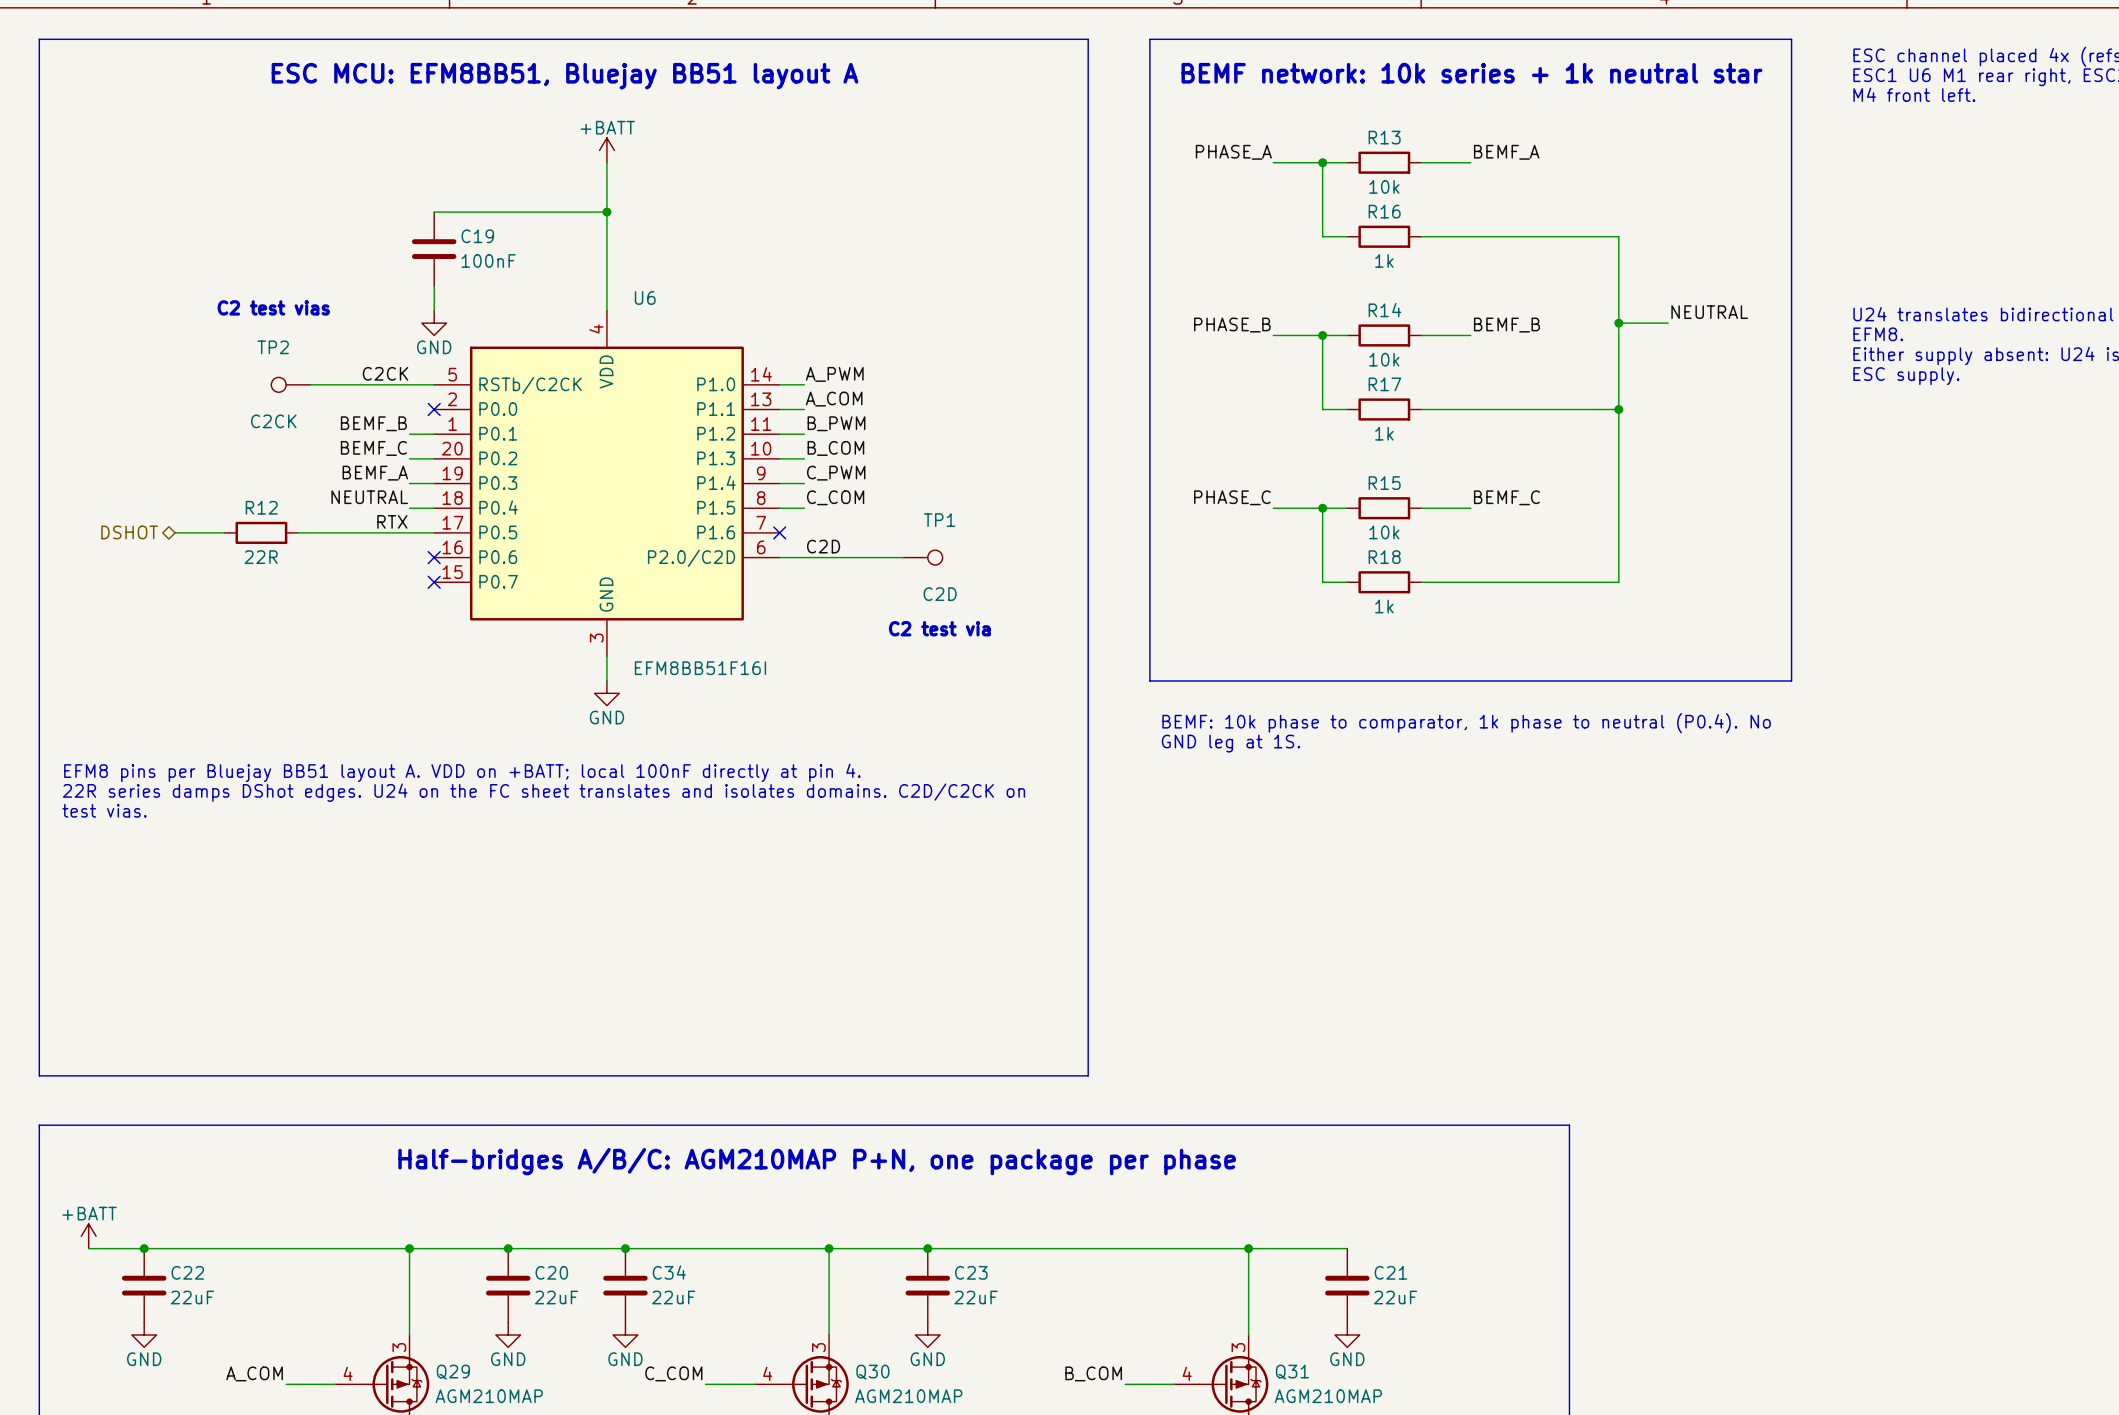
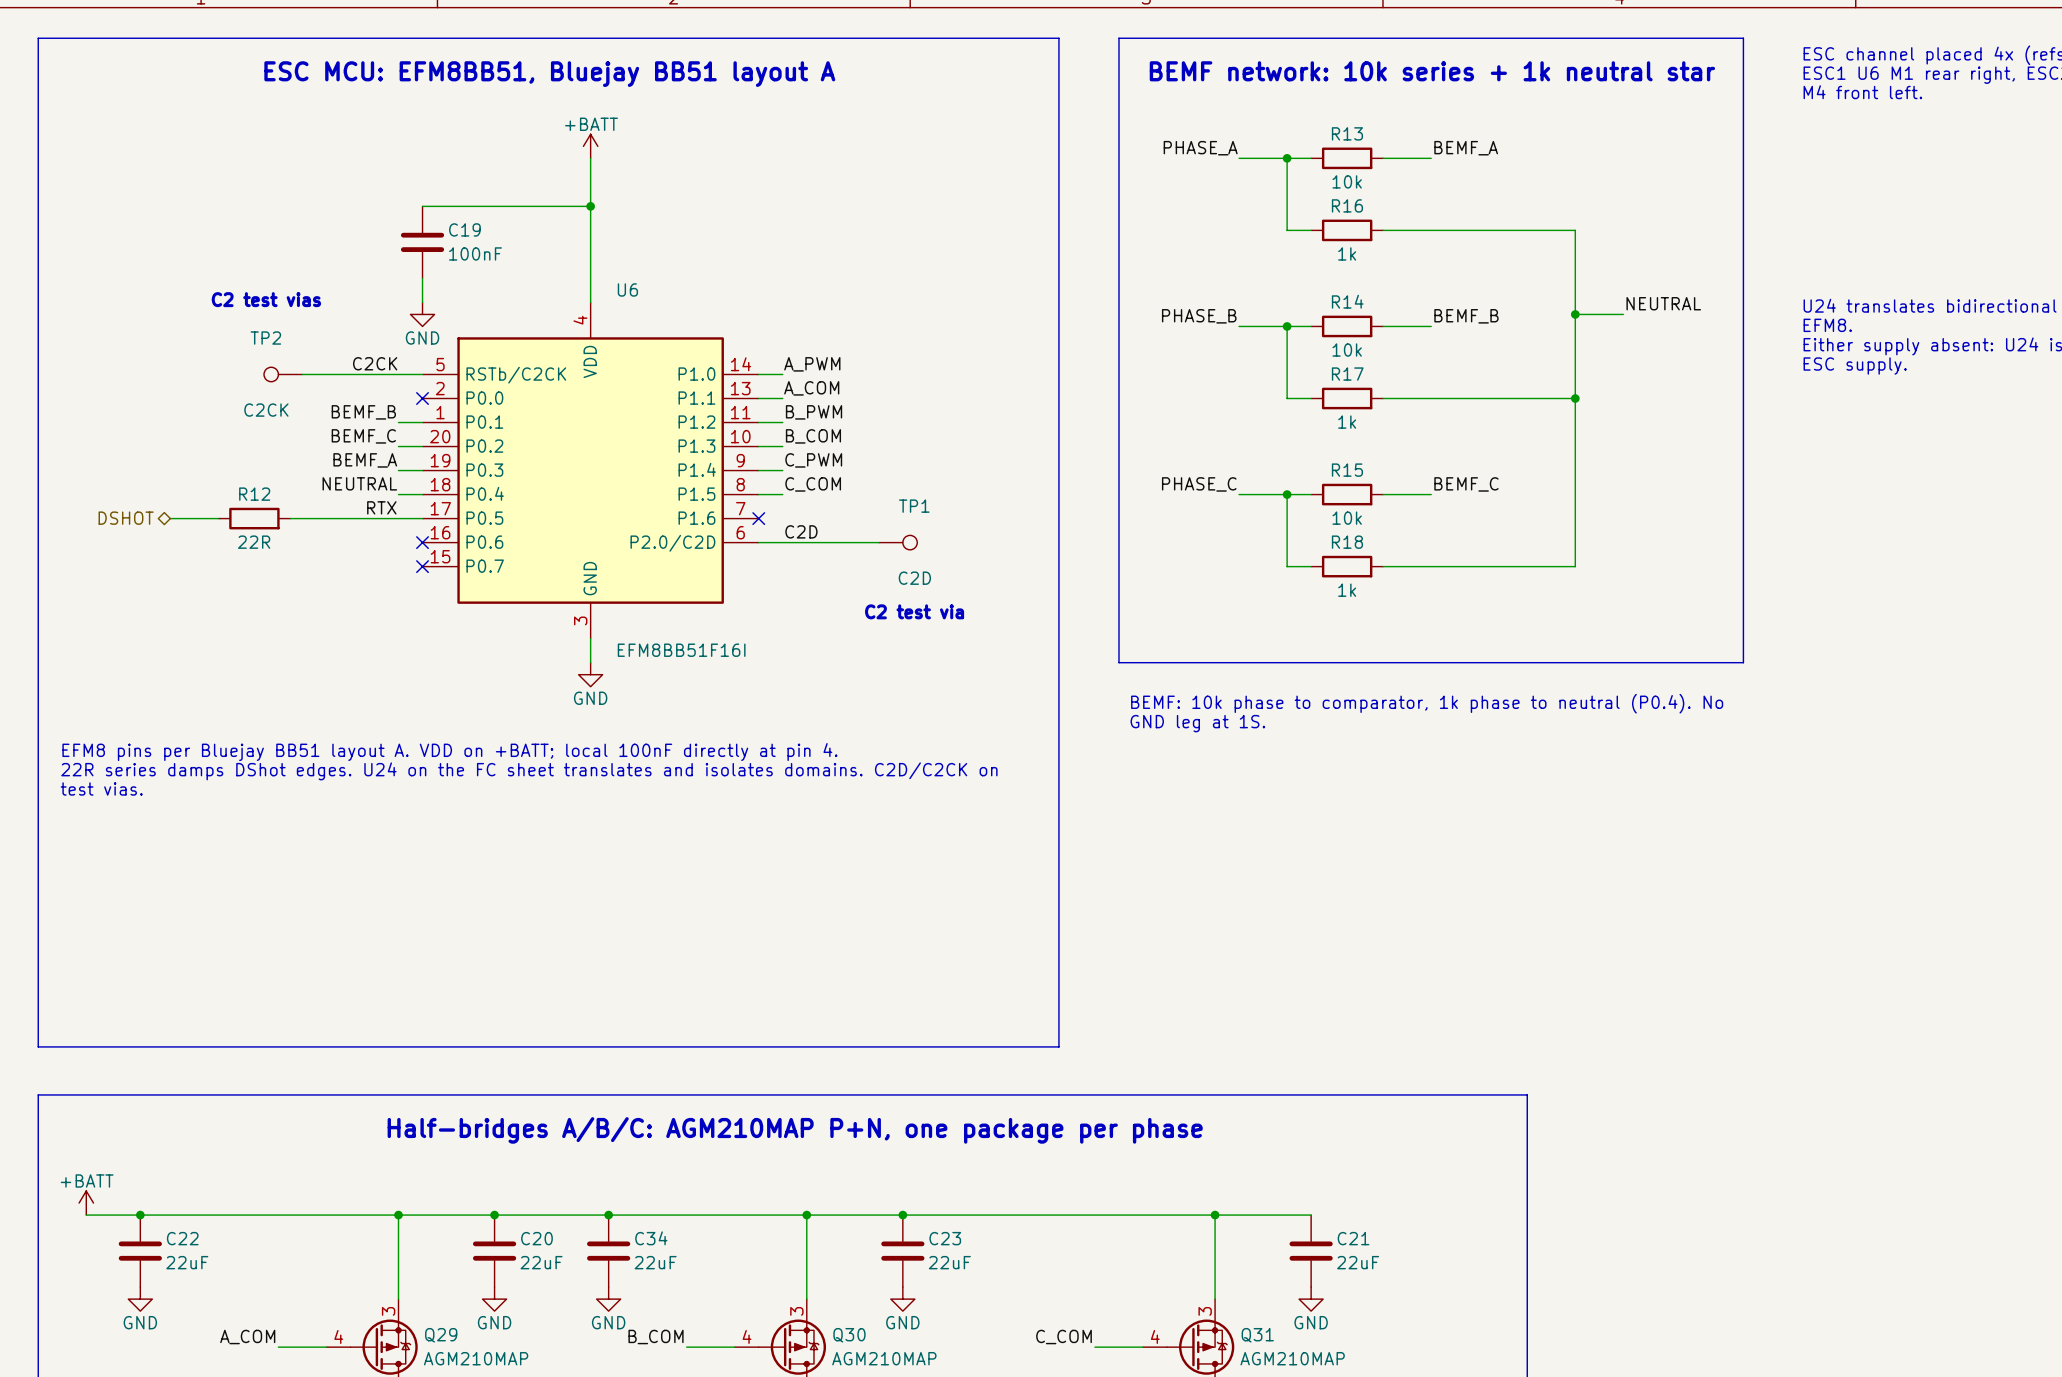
label: C_COM (673, 1373) -> B_COM (656, 1337)
label: B_COM (1093, 1373) -> C_COM (1064, 1337)

